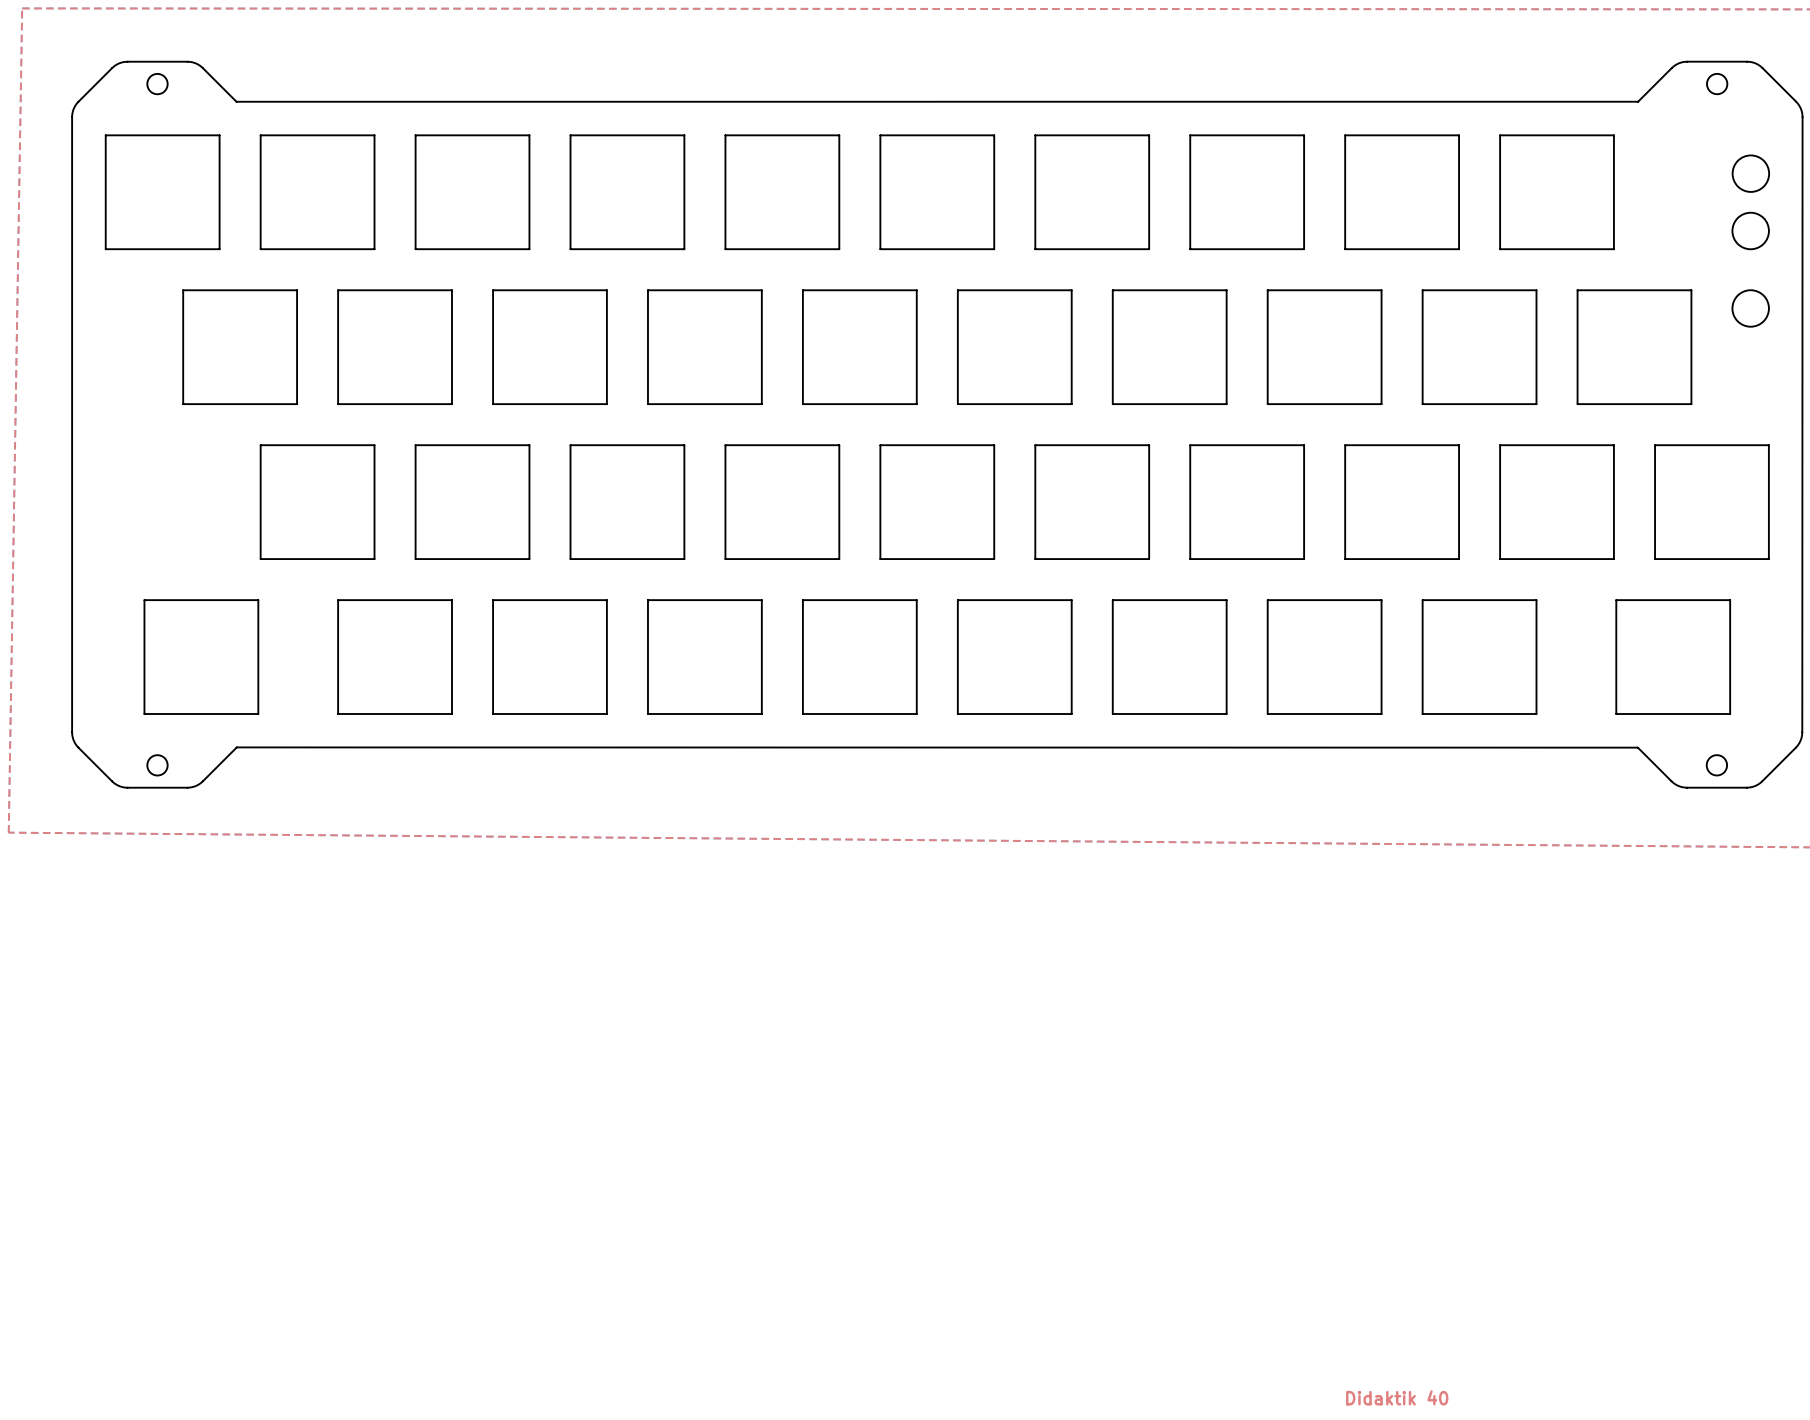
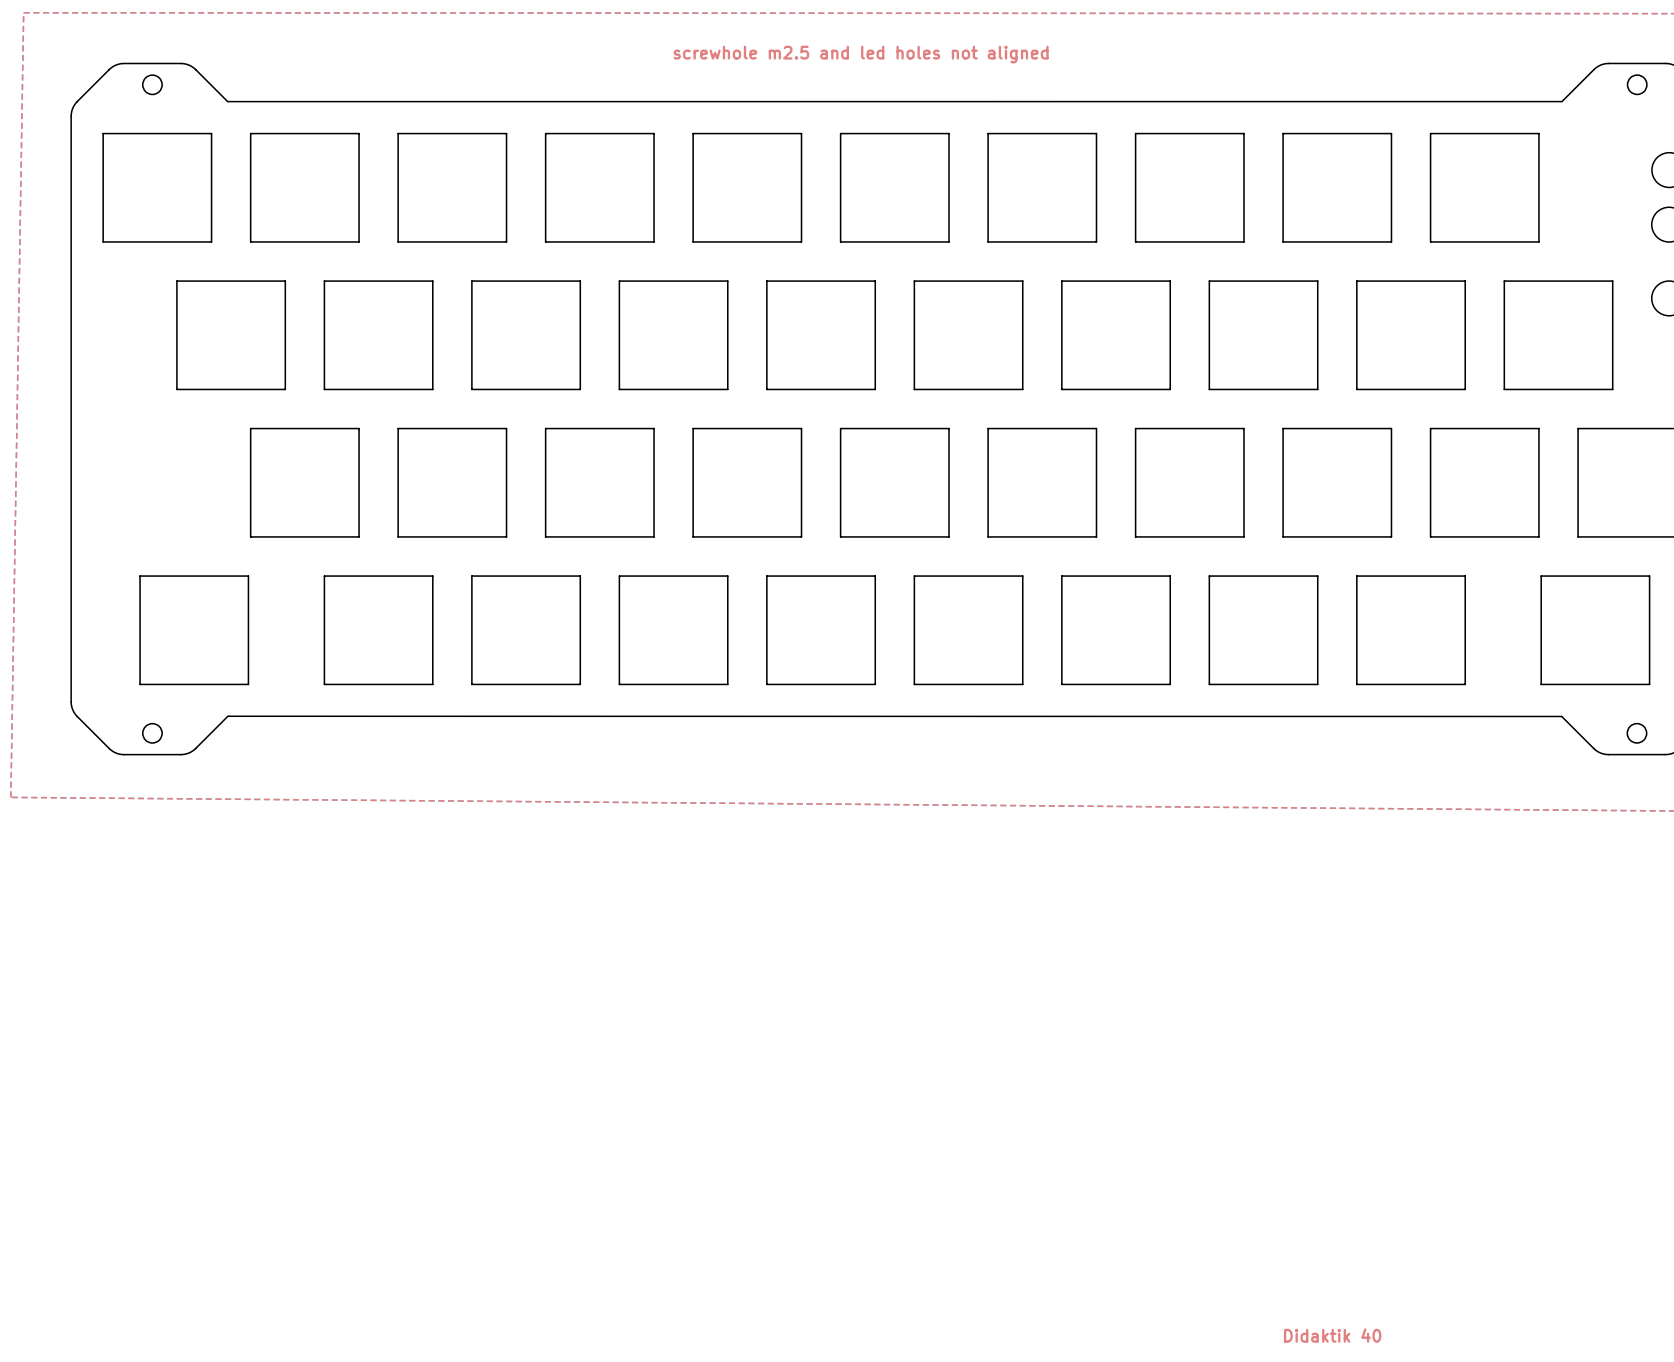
text: none -> screwhole m2.5 and led holes not aligned (861, 54)

